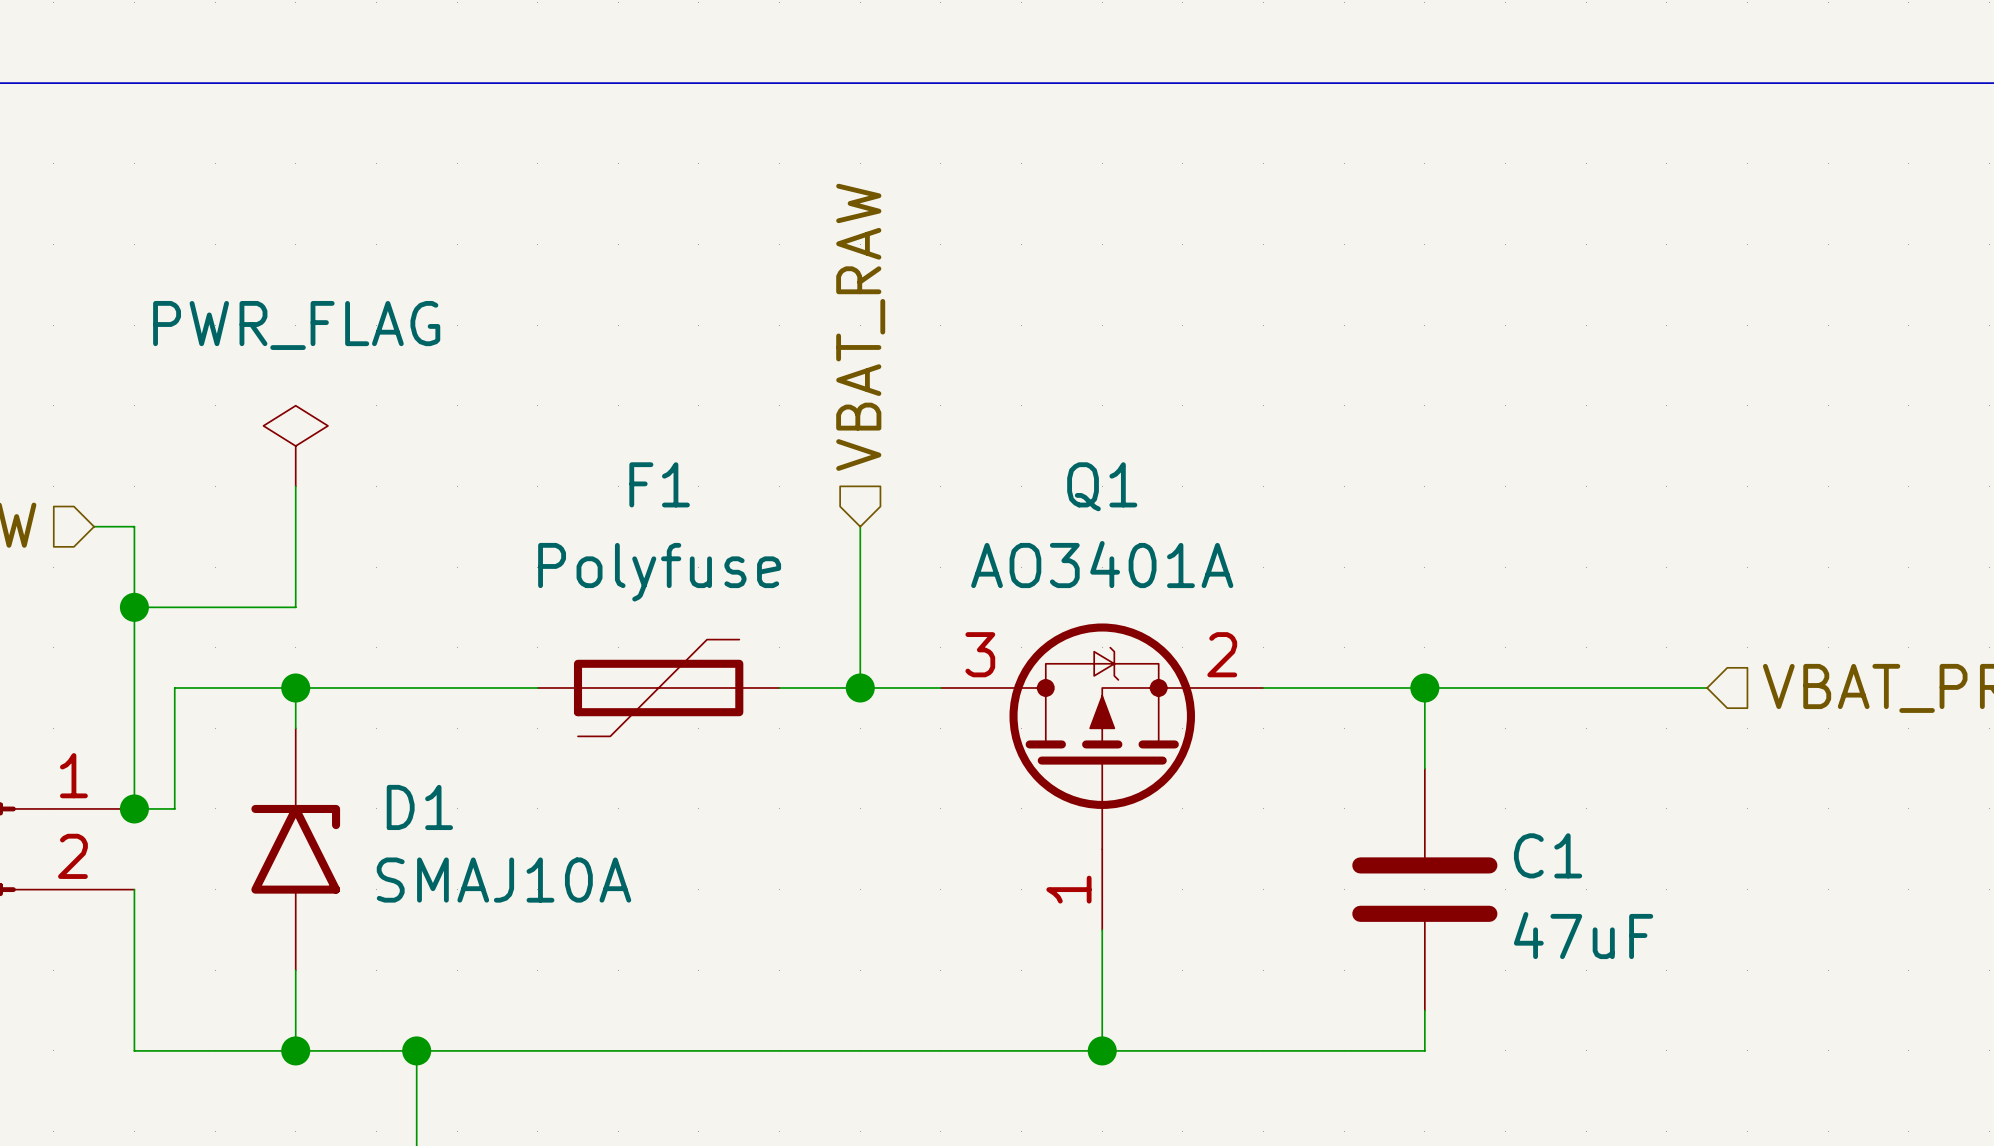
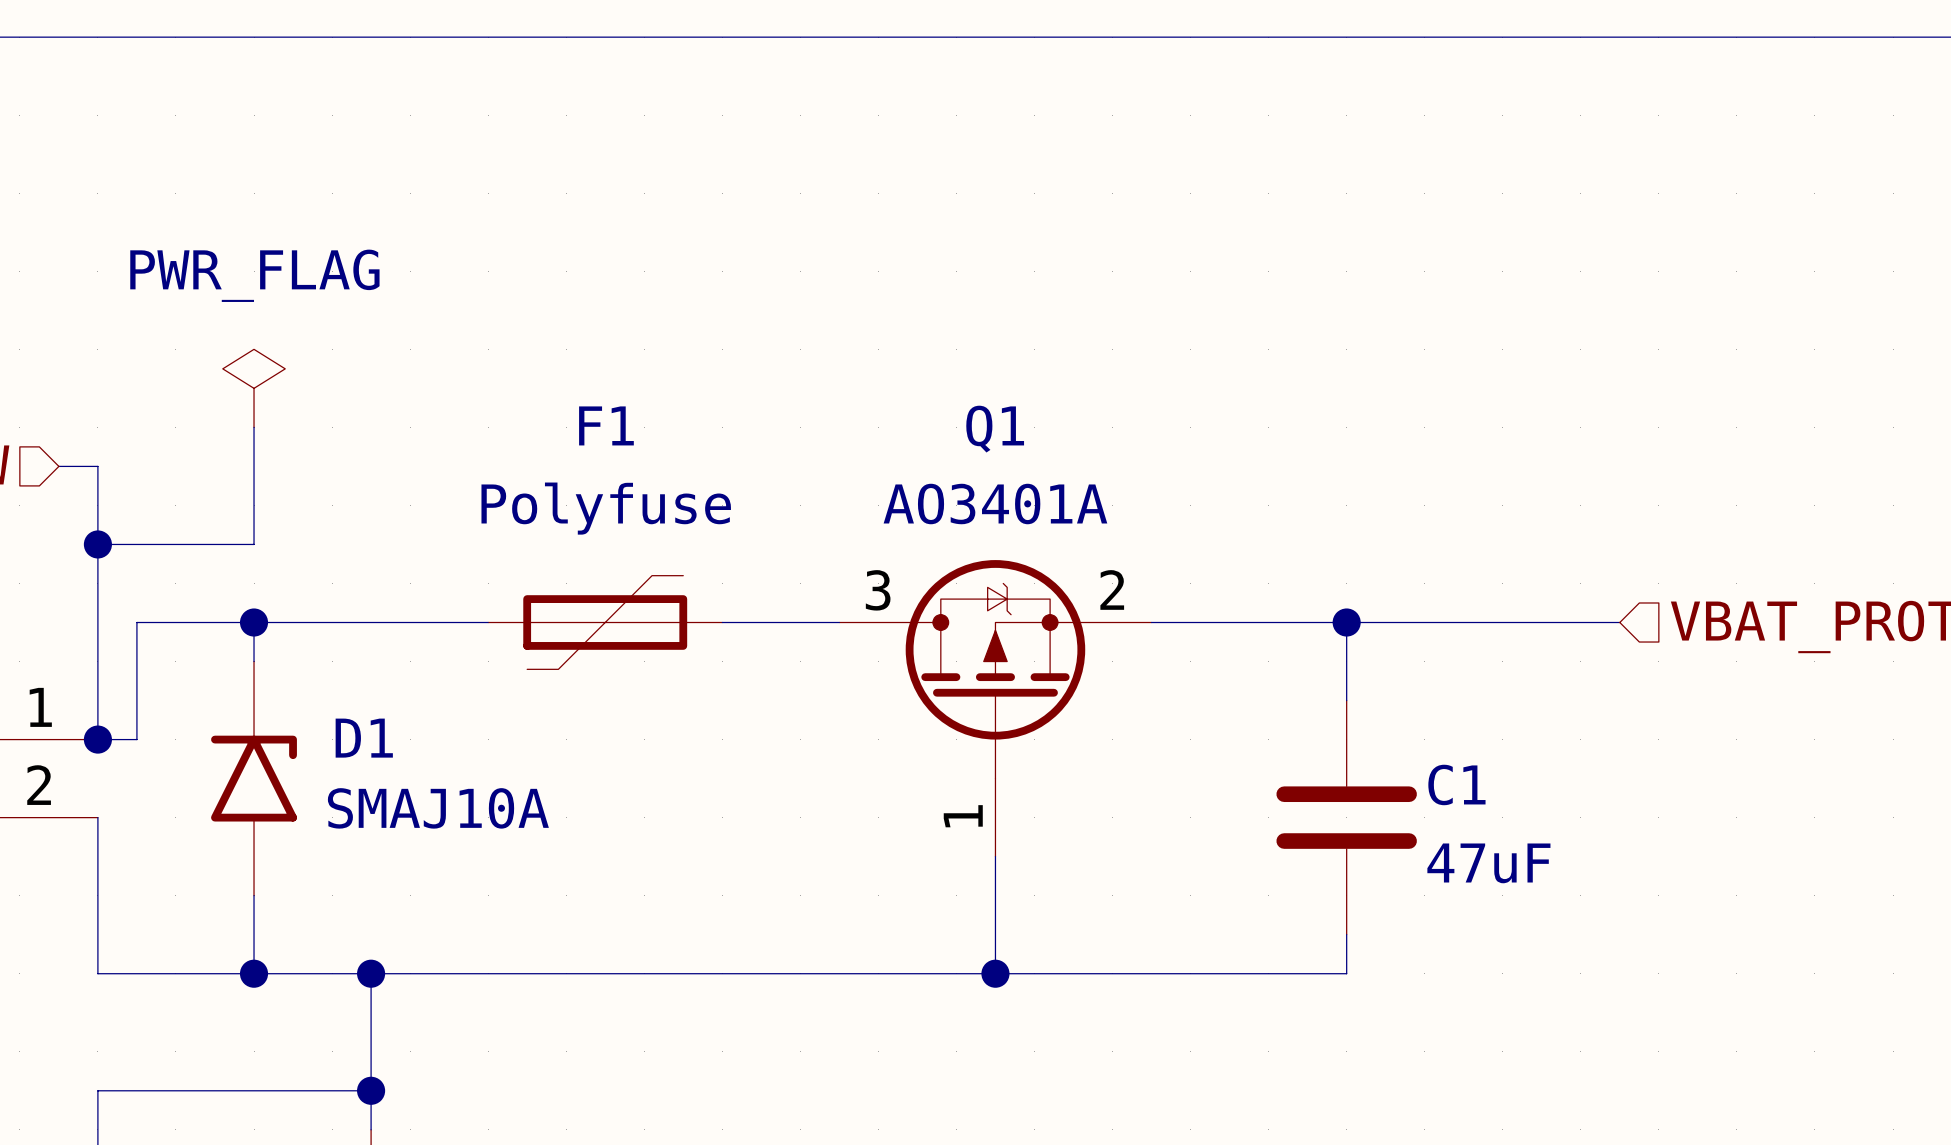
hierarchical label: VBAT_RAW (860, 327) -> none
wire: (860, 526) (860, 687) -> none
junction: (860, 687) -> none
Q1 position: (1102, 776) -> (995, 708)
wire: (1102, 929) (1102, 1050) -> (995, 856) (995, 973)
junction position: (1102, 1050) -> (995, 973)

